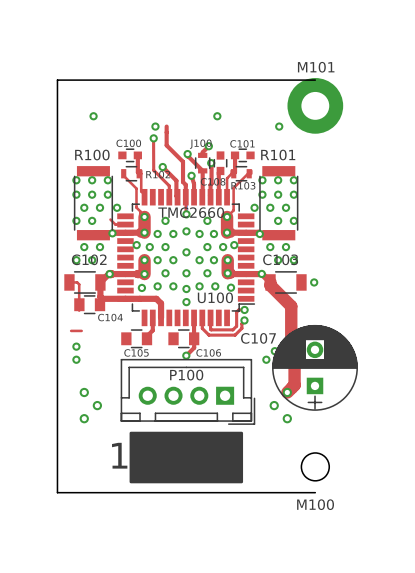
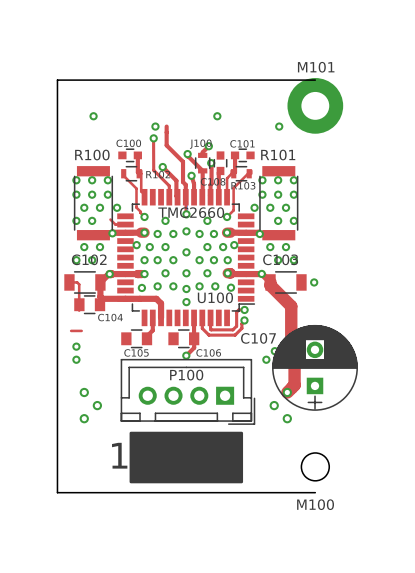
top track: (144, 216) (144, 232) -> none
top track: (227, 216) (227, 232) -> none
top track: (144, 260) (144, 274) -> none
top track: (227, 260) (227, 273) -> none

